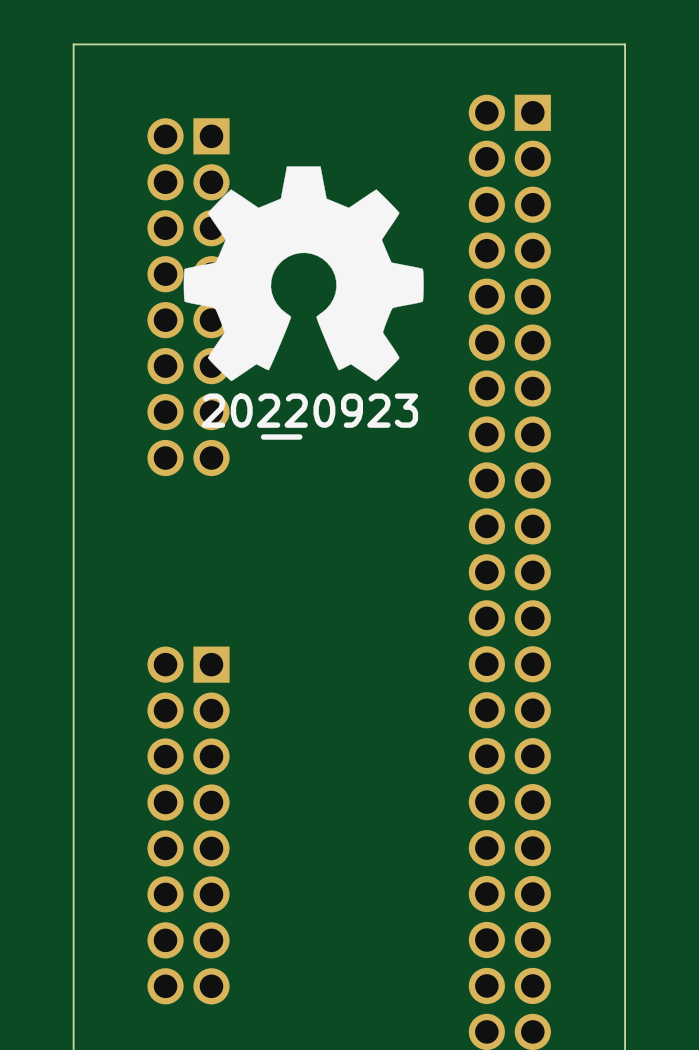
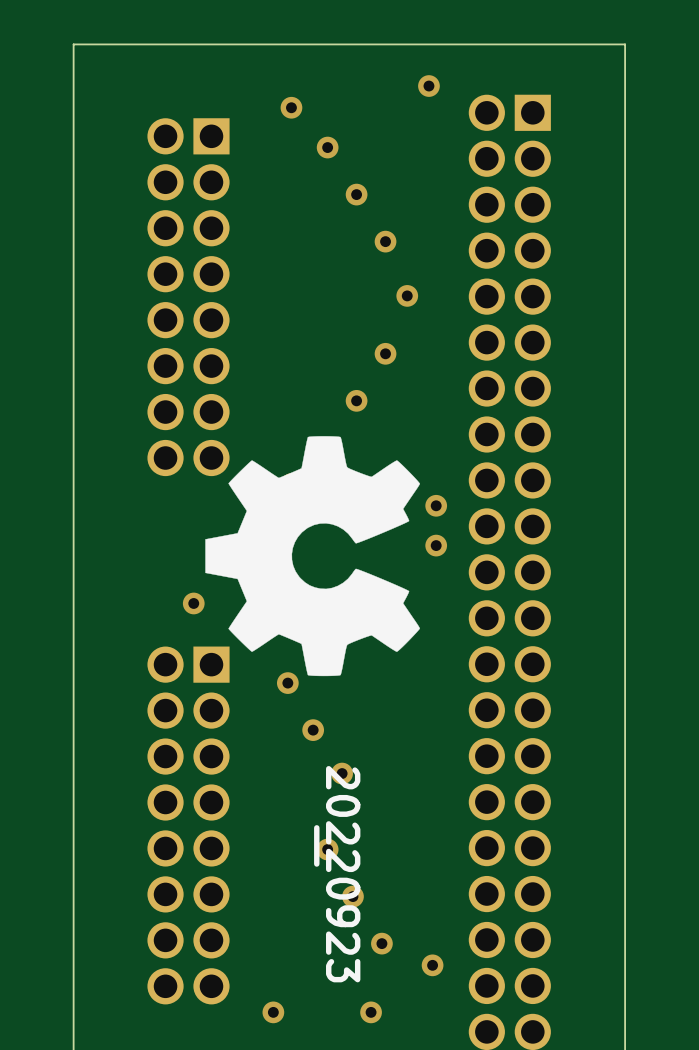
via: none -> (428, 86)
via: none -> (291, 107)
via: none -> (327, 147)
drawing: [183, 166, 424, 440] -> none
via: none -> (356, 194)
via: none -> (385, 241)
via: none -> (407, 295)
via: none -> (385, 353)
via: none -> (356, 400)
drawing: none -> [205, 436, 421, 677]
via: none -> (436, 505)
via: none -> (436, 545)
via: none -> (193, 603)
via: none -> (287, 683)
via: none -> (313, 730)
via: none -> (342, 773)
drawing: none -> [314, 825, 320, 867]
via: none -> (327, 849)
via: none -> (352, 896)
via: none -> (381, 943)
via: none -> (432, 965)
via: none -> (273, 1012)
via: none -> (371, 1012)

